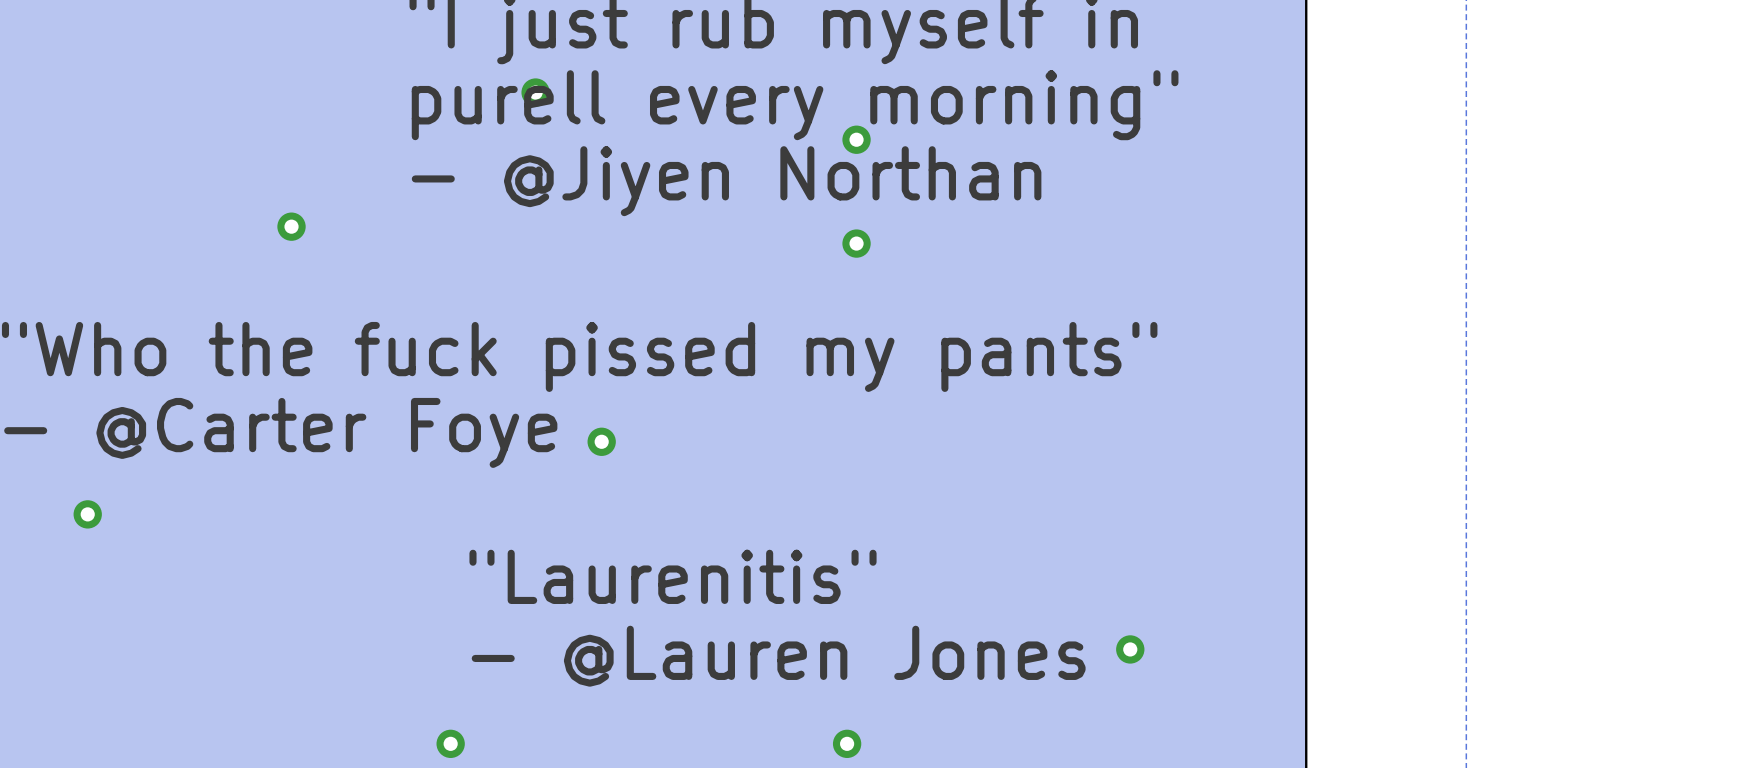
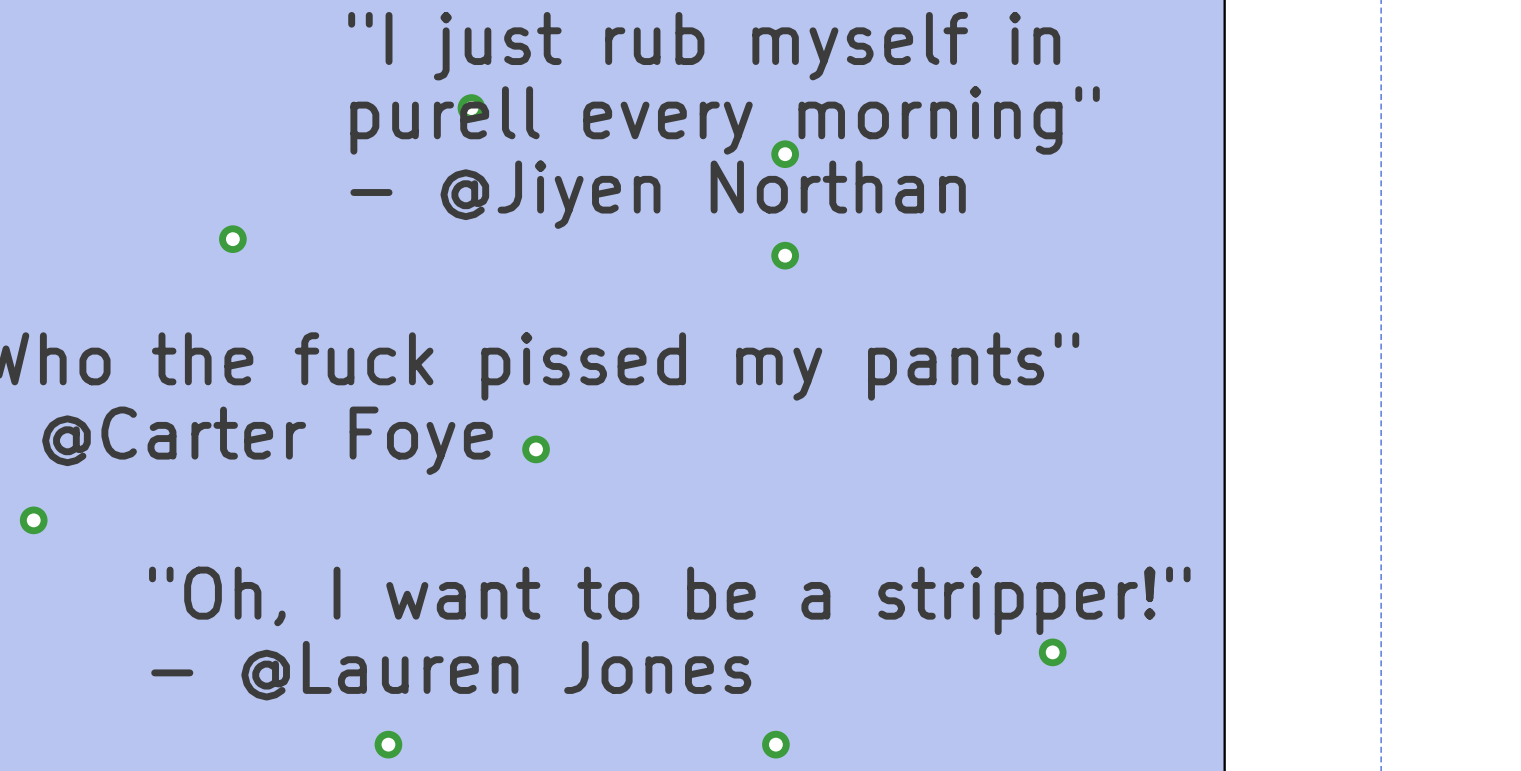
text: "Laurenitis" (673, 576) -> none
text: none -> "Oh, I want to be a stripper!" (669, 600)
text position: - @Lauren Jones (778, 656) -> - @Lauren Jones (451, 670)

